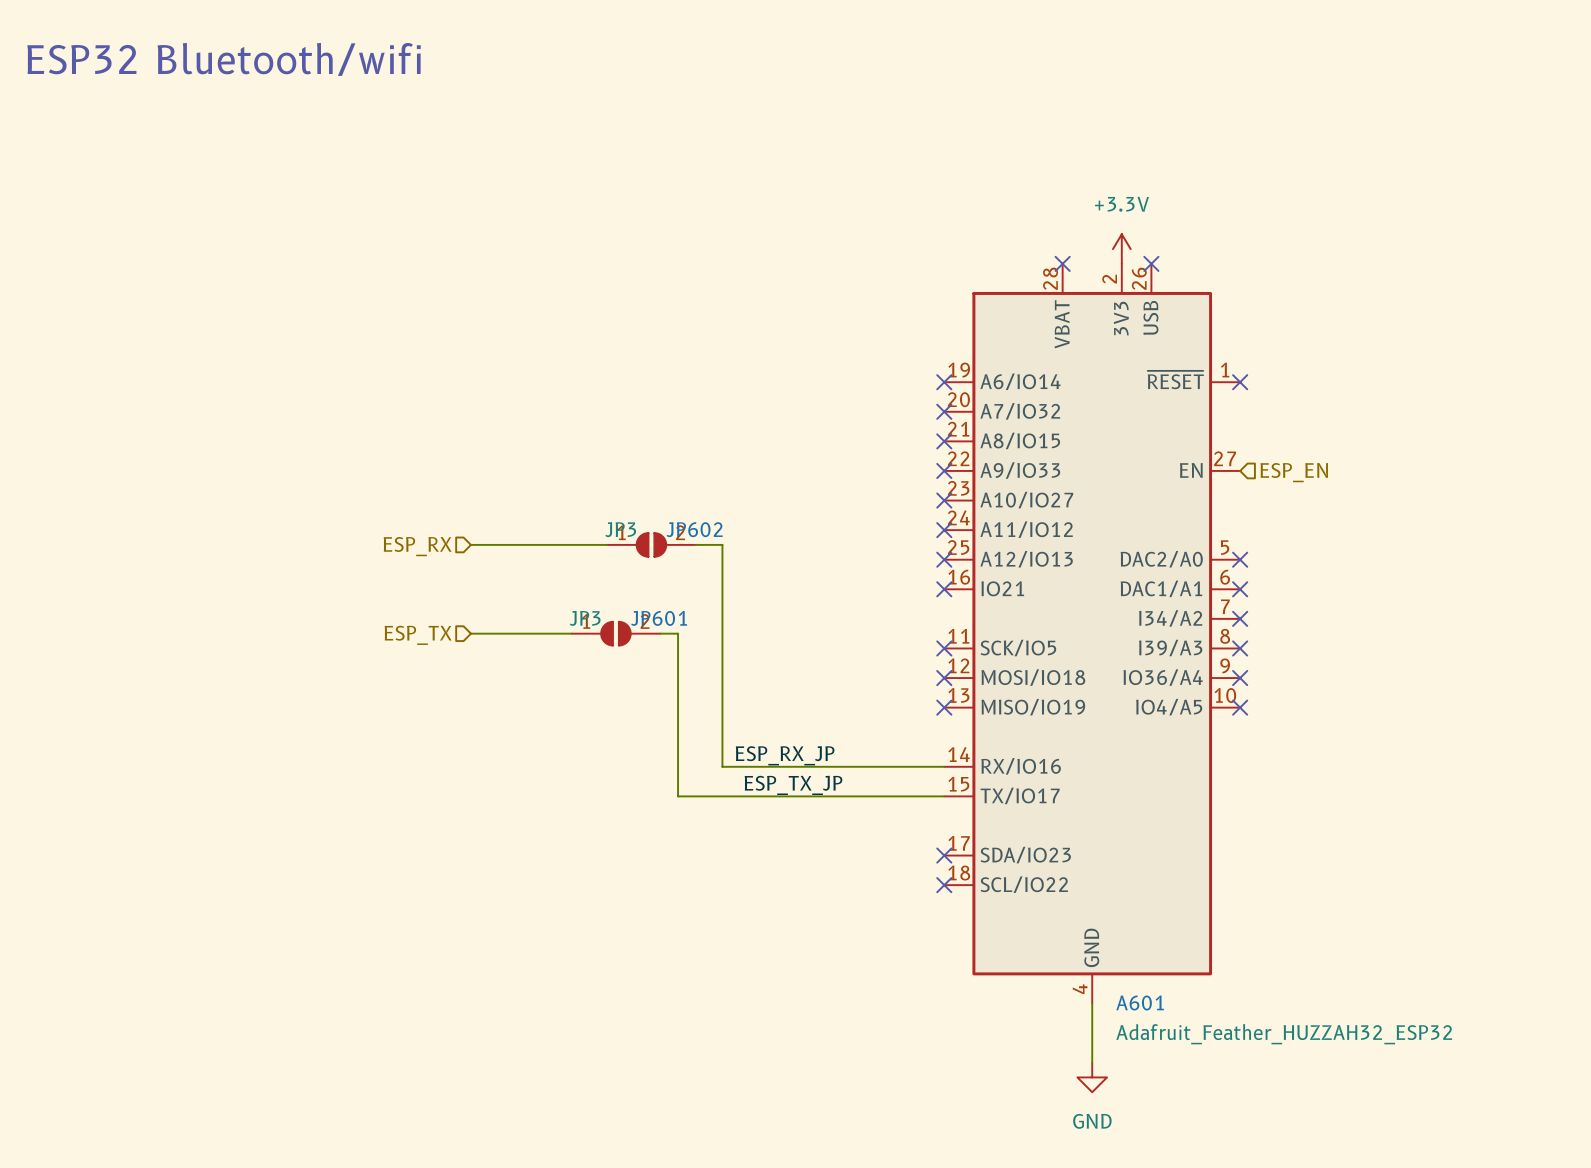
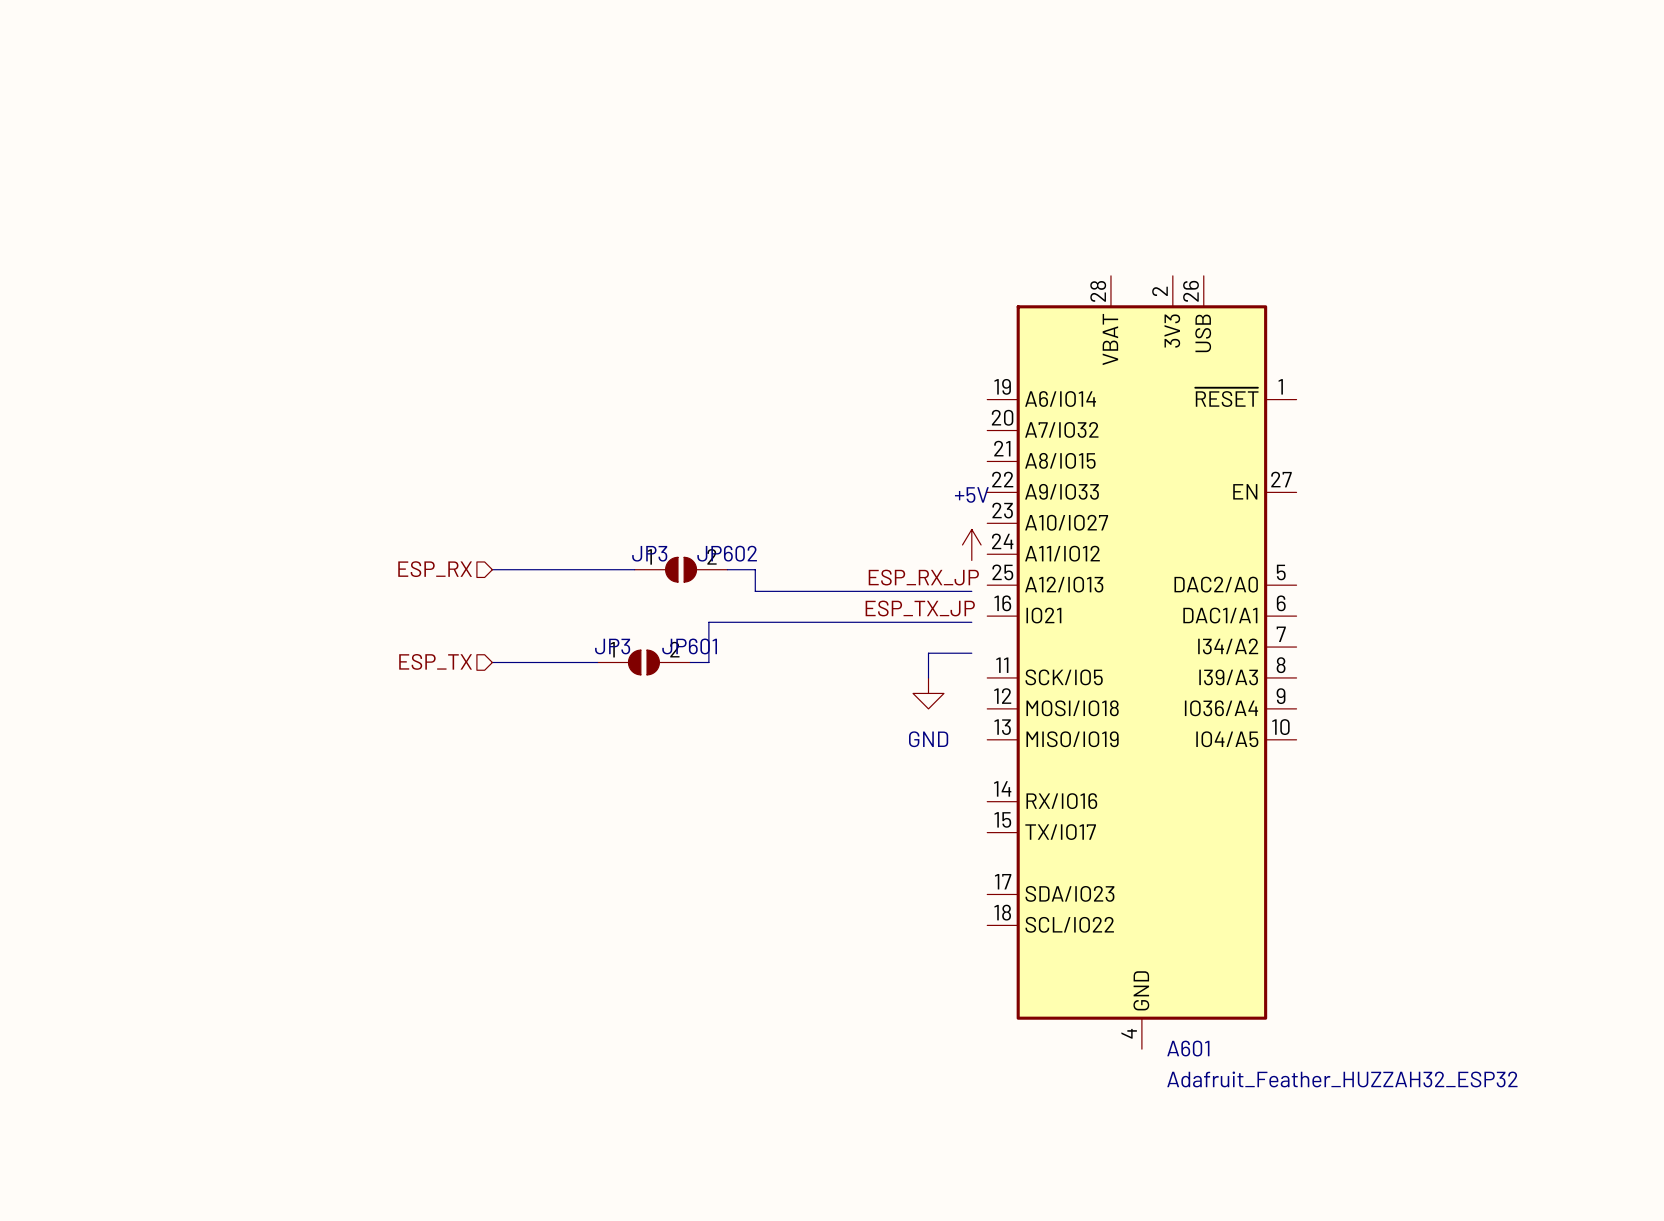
text: ESP32 Bluetooth/wifi (224, 59) -> none
power symbol: +3.3V (1121, 249) -> none
no-connect mark: (1062, 263) -> none
no-connect mark: (1151, 263) -> none
no-connect mark: (944, 382) -> none
no-connect mark: (1240, 382) -> none
no-connect mark: (944, 411) -> none
no-connect mark: (944, 441) -> none
no-connect mark: (944, 470) -> none
hierarchical label: ESP_EN (1294, 472) -> none
no-connect mark: (944, 500) -> none
power symbol: none -> +5V (971, 544)
no-connect mark: (944, 530) -> none
no-connect mark: (944, 559) -> none
no-connect mark: (1240, 559) -> none
wire: (722, 565) (722, 766) (944, 766) -> (755, 591) (971, 591)
no-connect mark: (944, 589) -> none
no-connect mark: (1240, 589) -> none
no-connect mark: (1240, 618) -> none
wire: none -> (971, 653) (928, 653) (928, 677)
wire: (678, 633) (678, 796) (944, 796) -> (708, 662) (708, 622) (971, 622)
no-connect mark: (944, 648) -> none
no-connect mark: (1240, 648) -> none
power symbol: none -> GND (928, 693)
no-connect mark: (944, 678) -> none
no-connect mark: (1240, 678) -> none
no-connect mark: (944, 707) -> none
no-connect mark: (1240, 707) -> none
label position: ESP_RX_JP (785, 755) -> ESP_RX_JP (923, 577)
label position: ESP_TX_JP (793, 785) -> ESP_TX_JP (920, 608)
no-connect mark: (944, 855) -> none
no-connect mark: (944, 885) -> none
wire: (1092, 1003) (1092, 1062) -> none
power symbol: GND (1092, 1077) -> none

